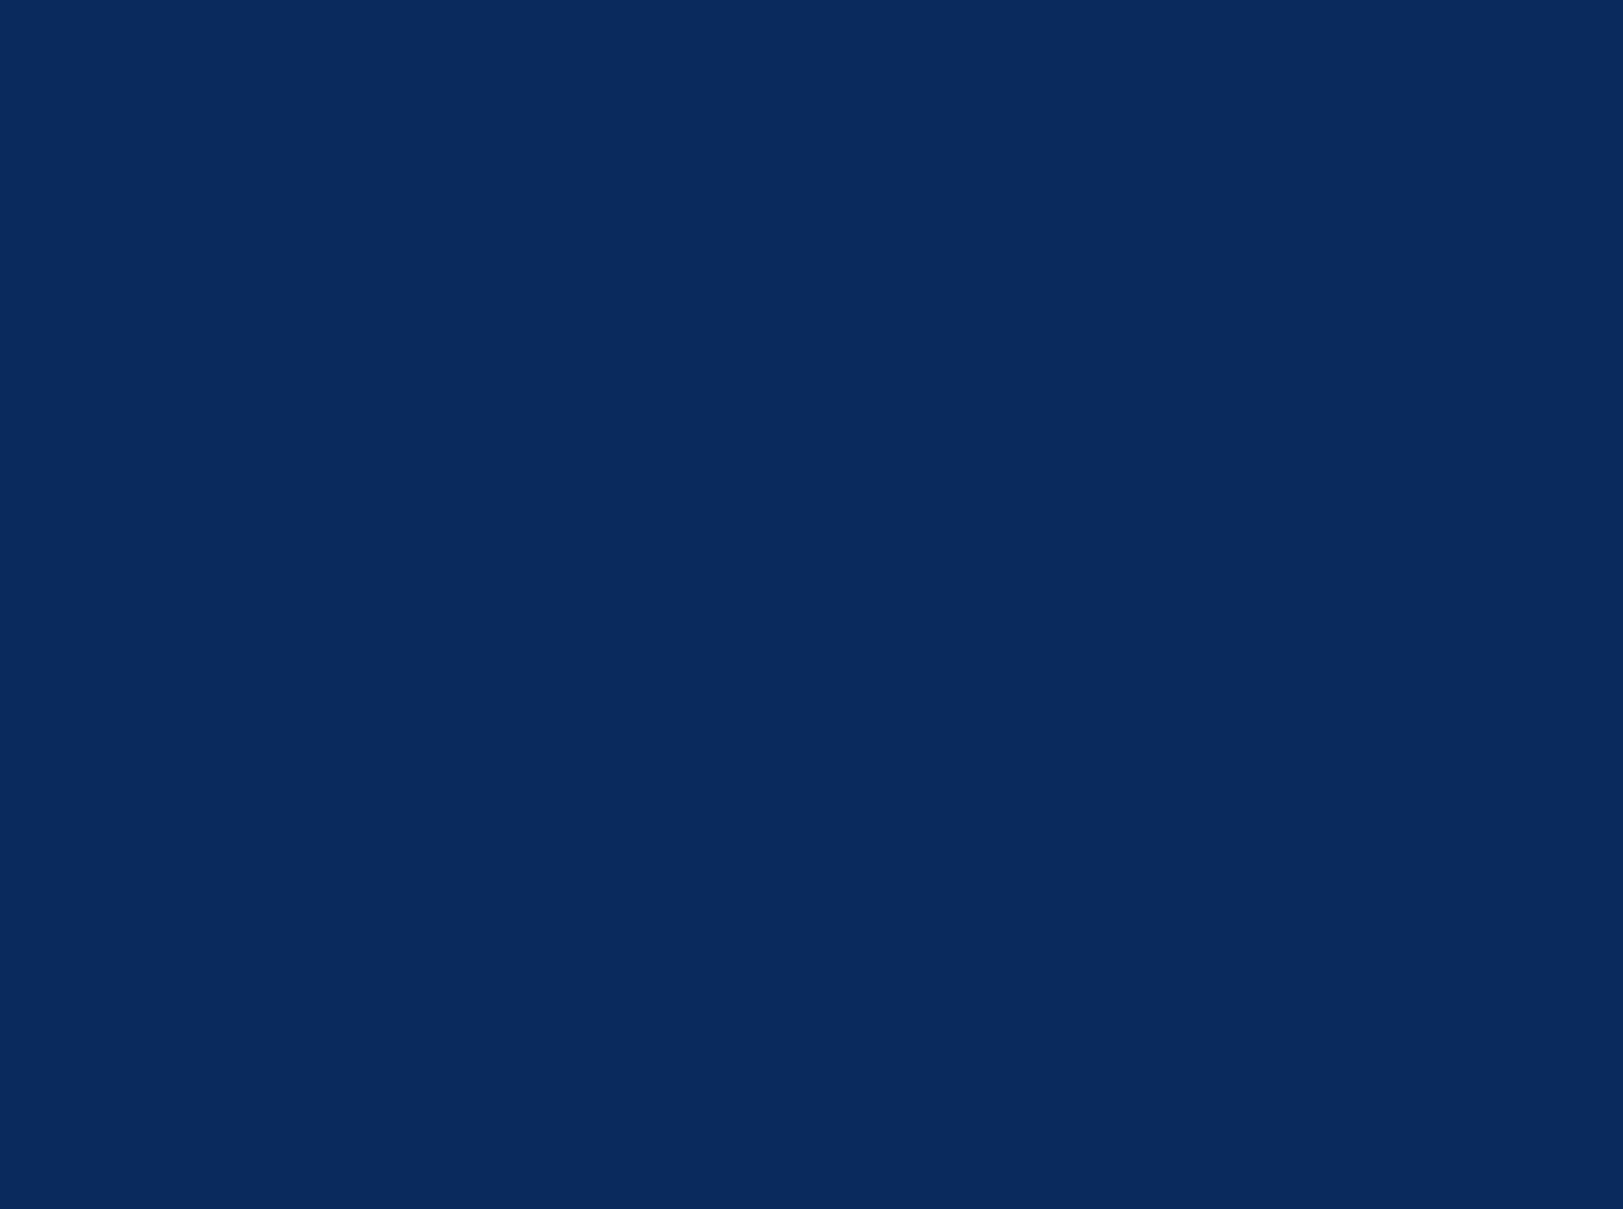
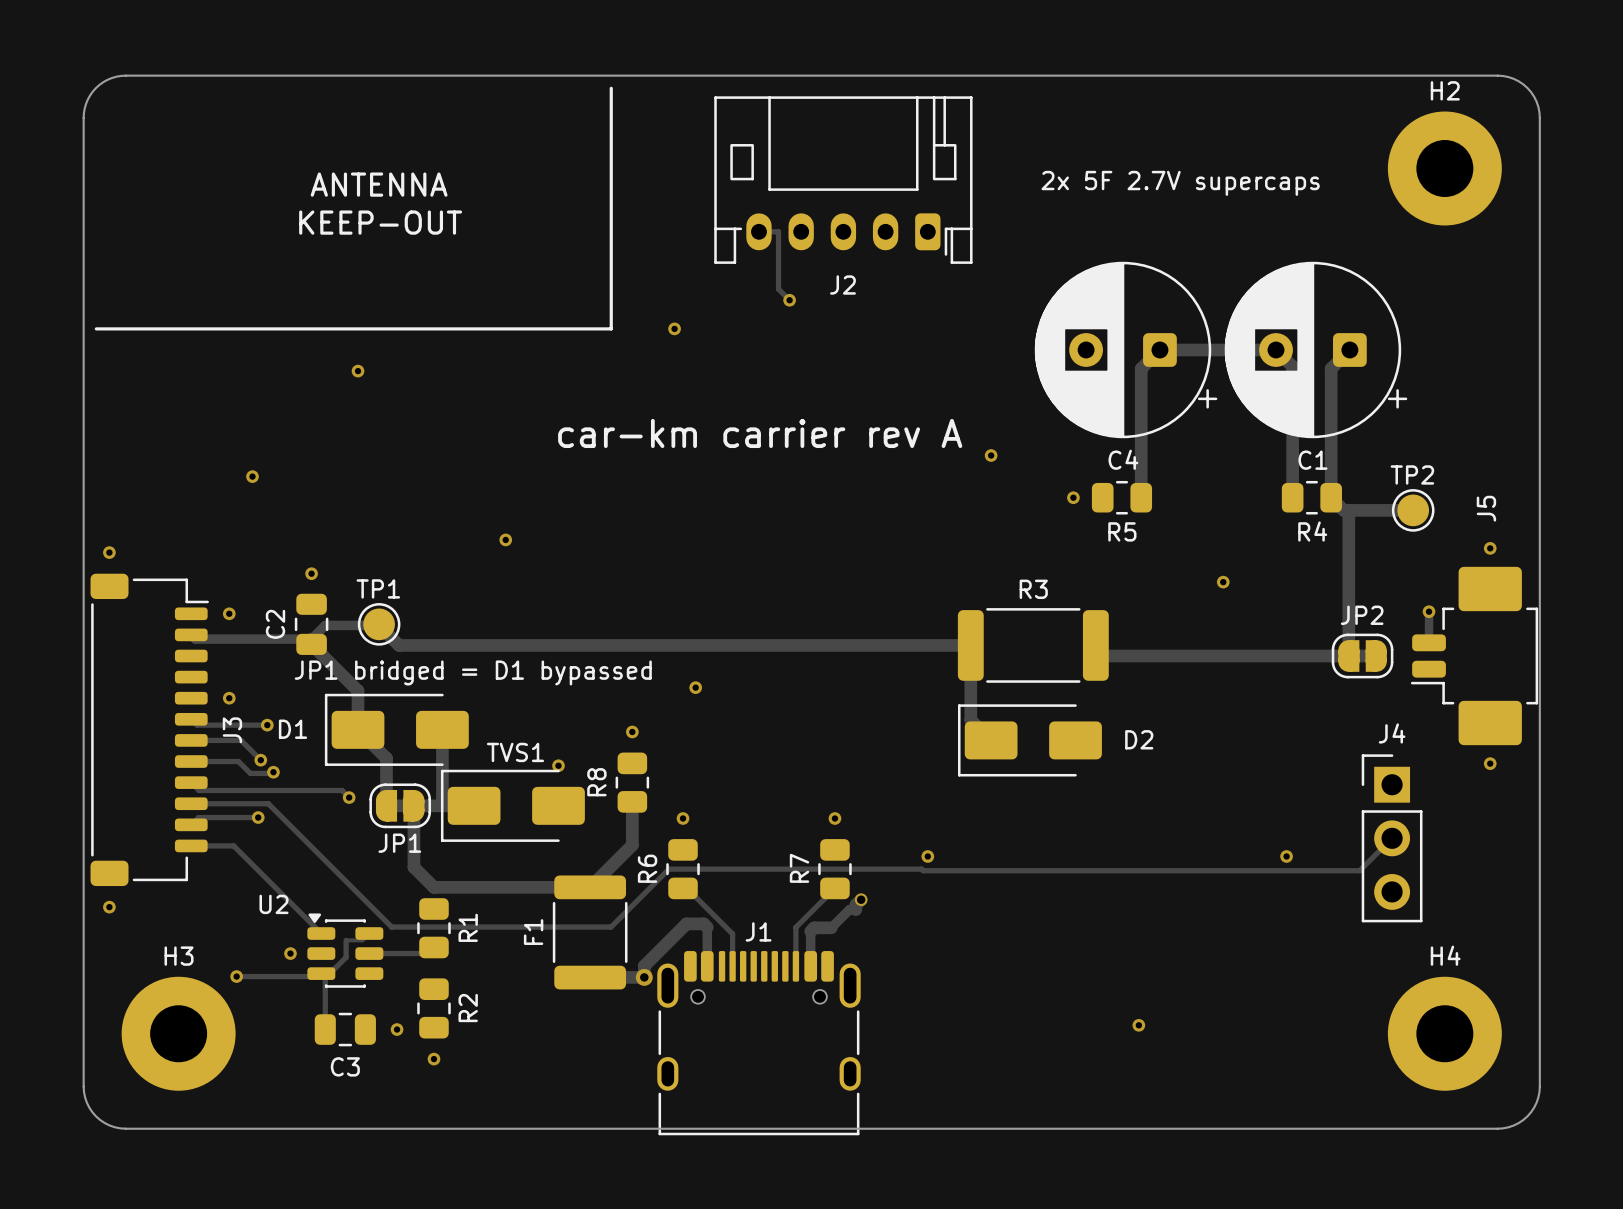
board edge: none -> (125, 75) (1497, 75) (1508, 77) (1523, 84) (1534, 96) (1539, 117) (1539, 1086) (1536, 1102) (1531, 1112) (1513, 1125) (1497, 1128) (125, 1128) (114, 1127) (100, 1120) (86, 1102) (83, 1086) (83, 117) (87, 99) (96, 88) (107, 79) (125, 75)
line: none -> (611, 88) (611, 328) (96, 328)
H2: none -> (1444, 168)
J2: none -> (843, 180)
text: none -> 2x 5F 2.7V supercaps (1180, 183)
text: none -> ANTENNA (379, 184)
text: none -> KEEP-OUT (380, 222)
track: none -> (758, 231) (778, 231) (778, 289) (789, 300)
via: none -> (789, 300)
via: none -> (674, 328)
C4: none -> (1126, 349)
C1: none -> (1316, 349)
track: none -> (1349, 349) (1331, 368) (1331, 497) (1343, 510) (1413, 510)
via: none -> (358, 371)
text: none -> car-km carrier rev A (760, 433)
via: none -> (991, 455)
via: none -> (252, 476)
via: none -> (1073, 497)
R5: none -> (1121, 497)
track: none -> (1141, 497) (1141, 368) (1159, 349) (1276, 349) (1292, 366) (1292, 497)
R4: none -> (1311, 497)
track: none -> (1348, 510) (1348, 656) (1095, 656)
TP2: none -> (1413, 510)
via: none -> (505, 539)
via: none -> (1490, 548)
via: none -> (109, 552)
via: none -> (311, 573)
via: none -> (1223, 582)
track: none -> (1429, 611) (1429, 642)
via: none -> (1429, 611)
via: none -> (229, 613)
C2: none -> (311, 624)
TP1: none -> (379, 624)
track: none -> (379, 625) (399, 645) (970, 645) (970, 720) (991, 740)
track: none -> (379, 625) (325, 625) (311, 639)
track: none -> (191, 634) (195, 639) (311, 639)
track: none -> (311, 639) (311, 644) (358, 690) (358, 729) (386, 758) (386, 805)
R3: none -> (1033, 645)
JP2: none -> (1362, 656)
J5: none -> (1474, 656)
text: none -> JP1 bridged = D1 bypassed (473, 672)
via: none -> (695, 687)
via: none -> (229, 698)
track: none -> (191, 719) (197, 725) (267, 725)
via: none -> (267, 725)
J3: none -> (149, 729)
D1: none -> (396, 729)
track: none -> (442, 729) (442, 805)
via: none -> (632, 731)
track: none -> (191, 740) (241, 740) (260, 760)
D2: none -> (1029, 740)
via: none -> (260, 760)
track: none -> (191, 761) (238, 761) (250, 773) (273, 772)
via: none -> (1490, 763)
via: none -> (558, 765)
via: none -> (273, 772)
track: none -> (191, 782) (199, 790) (342, 790) (349, 797)
R8: none -> (632, 782)
via: none -> (349, 797)
track: none -> (632, 801) (632, 845) (590, 887) (433, 887) (413, 867) (413, 805) (474, 805)
track: none -> (191, 803) (268, 803) (391, 927) (611, 927) (668, 869) (1359, 870) (1392, 838)
JP1: none -> (400, 805)
TVS1: none -> (512, 805)
track: none -> (258, 817) (198, 817) (191, 824)
via: none -> (258, 817)
via: none -> (683, 818)
via: none -> (834, 818)
J4: none -> (1392, 838)
track: none -> (191, 845) (233, 845) (321, 933)
via: none -> (927, 856)
via: none -> (1286, 856)
R6: none -> (683, 869)
R7: none -> (834, 869)
track: none -> (683, 888) (687, 888) (732, 933) (732, 966)
track: none -> (834, 888) (795, 927) (795, 966)
track: none -> (861, 899) (855, 905) (855, 909) (849, 909) (831, 927) (814, 927) (810, 931) (810, 966)
via: none -> (861, 899)
via: none -> (109, 907)
R1: none -> (433, 928)
F1: none -> (590, 932)
track: none -> (369, 933) (362, 940) (346, 940) (346, 957) (325, 977)
track: none -> (433, 947) (427, 953) (369, 953)
U2: none -> (345, 950)
via: none -> (290, 953)
track: none -> (707, 966) (707, 927) (703, 923) (686, 923) (644, 966) (644, 977) (590, 977)
track: none -> (236, 976) (318, 976) (321, 973) (325, 977)
via: none -> (236, 976)
track: none -> (325, 977) (325, 1029)
via: none -> (644, 977)
R2: none -> (433, 1008)
via: none -> (1138, 1025)
C3: none -> (345, 1029)
via: none -> (397, 1029)
H3: none -> (178, 1033)
H4: none -> (1444, 1033)
J1: none -> (758, 1043)
via: none -> (433, 1059)

